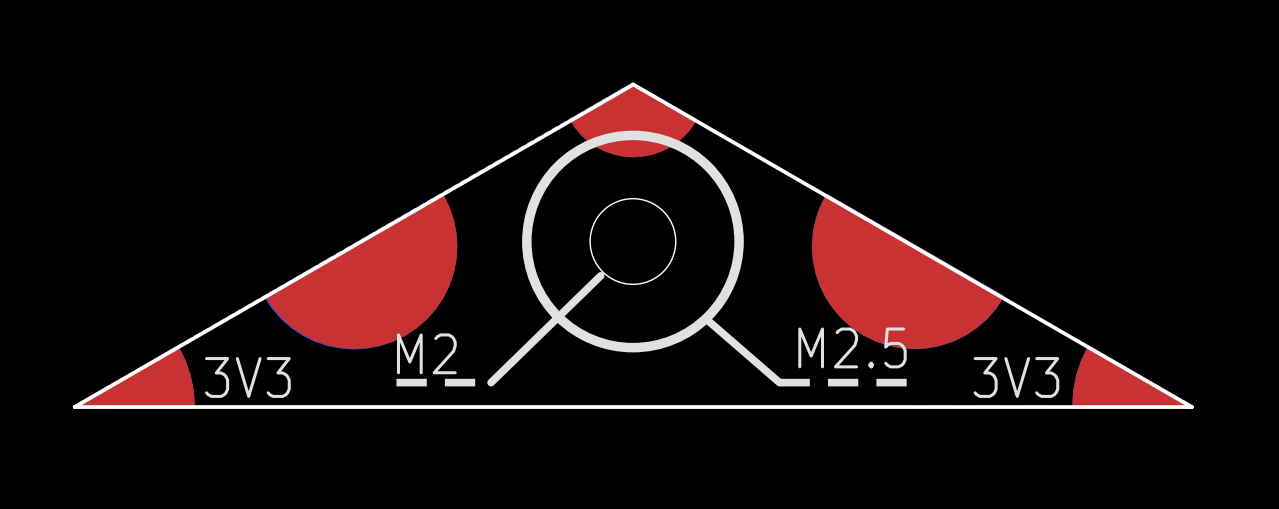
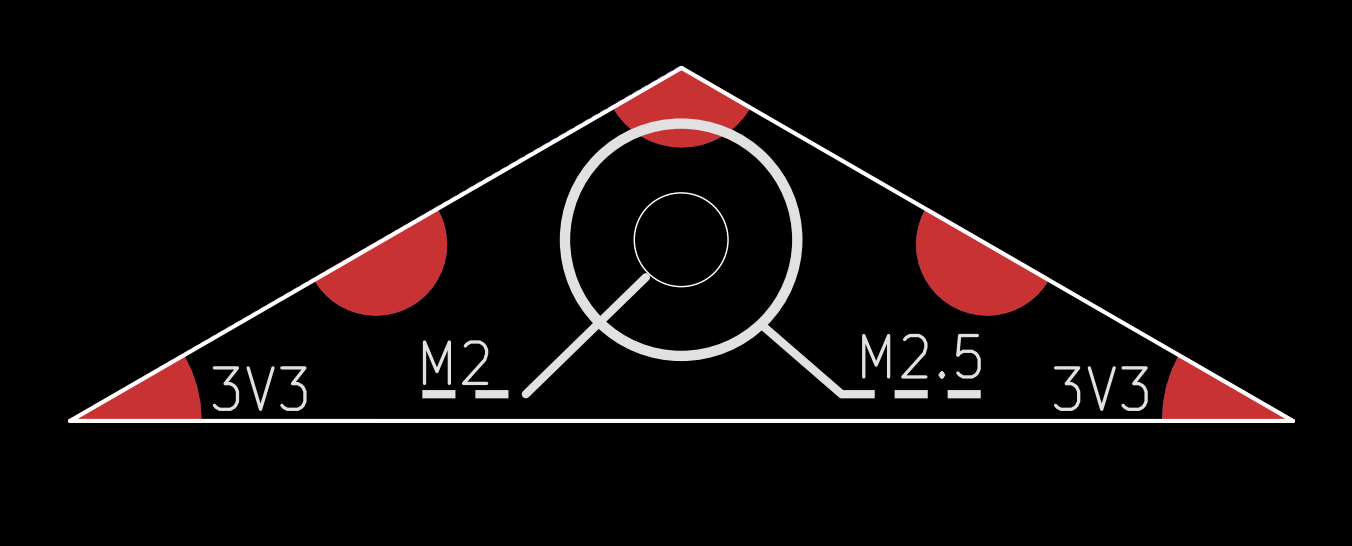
part footprint: [72, 82, 1194, 409] -> [68, 65, 1295, 423]

